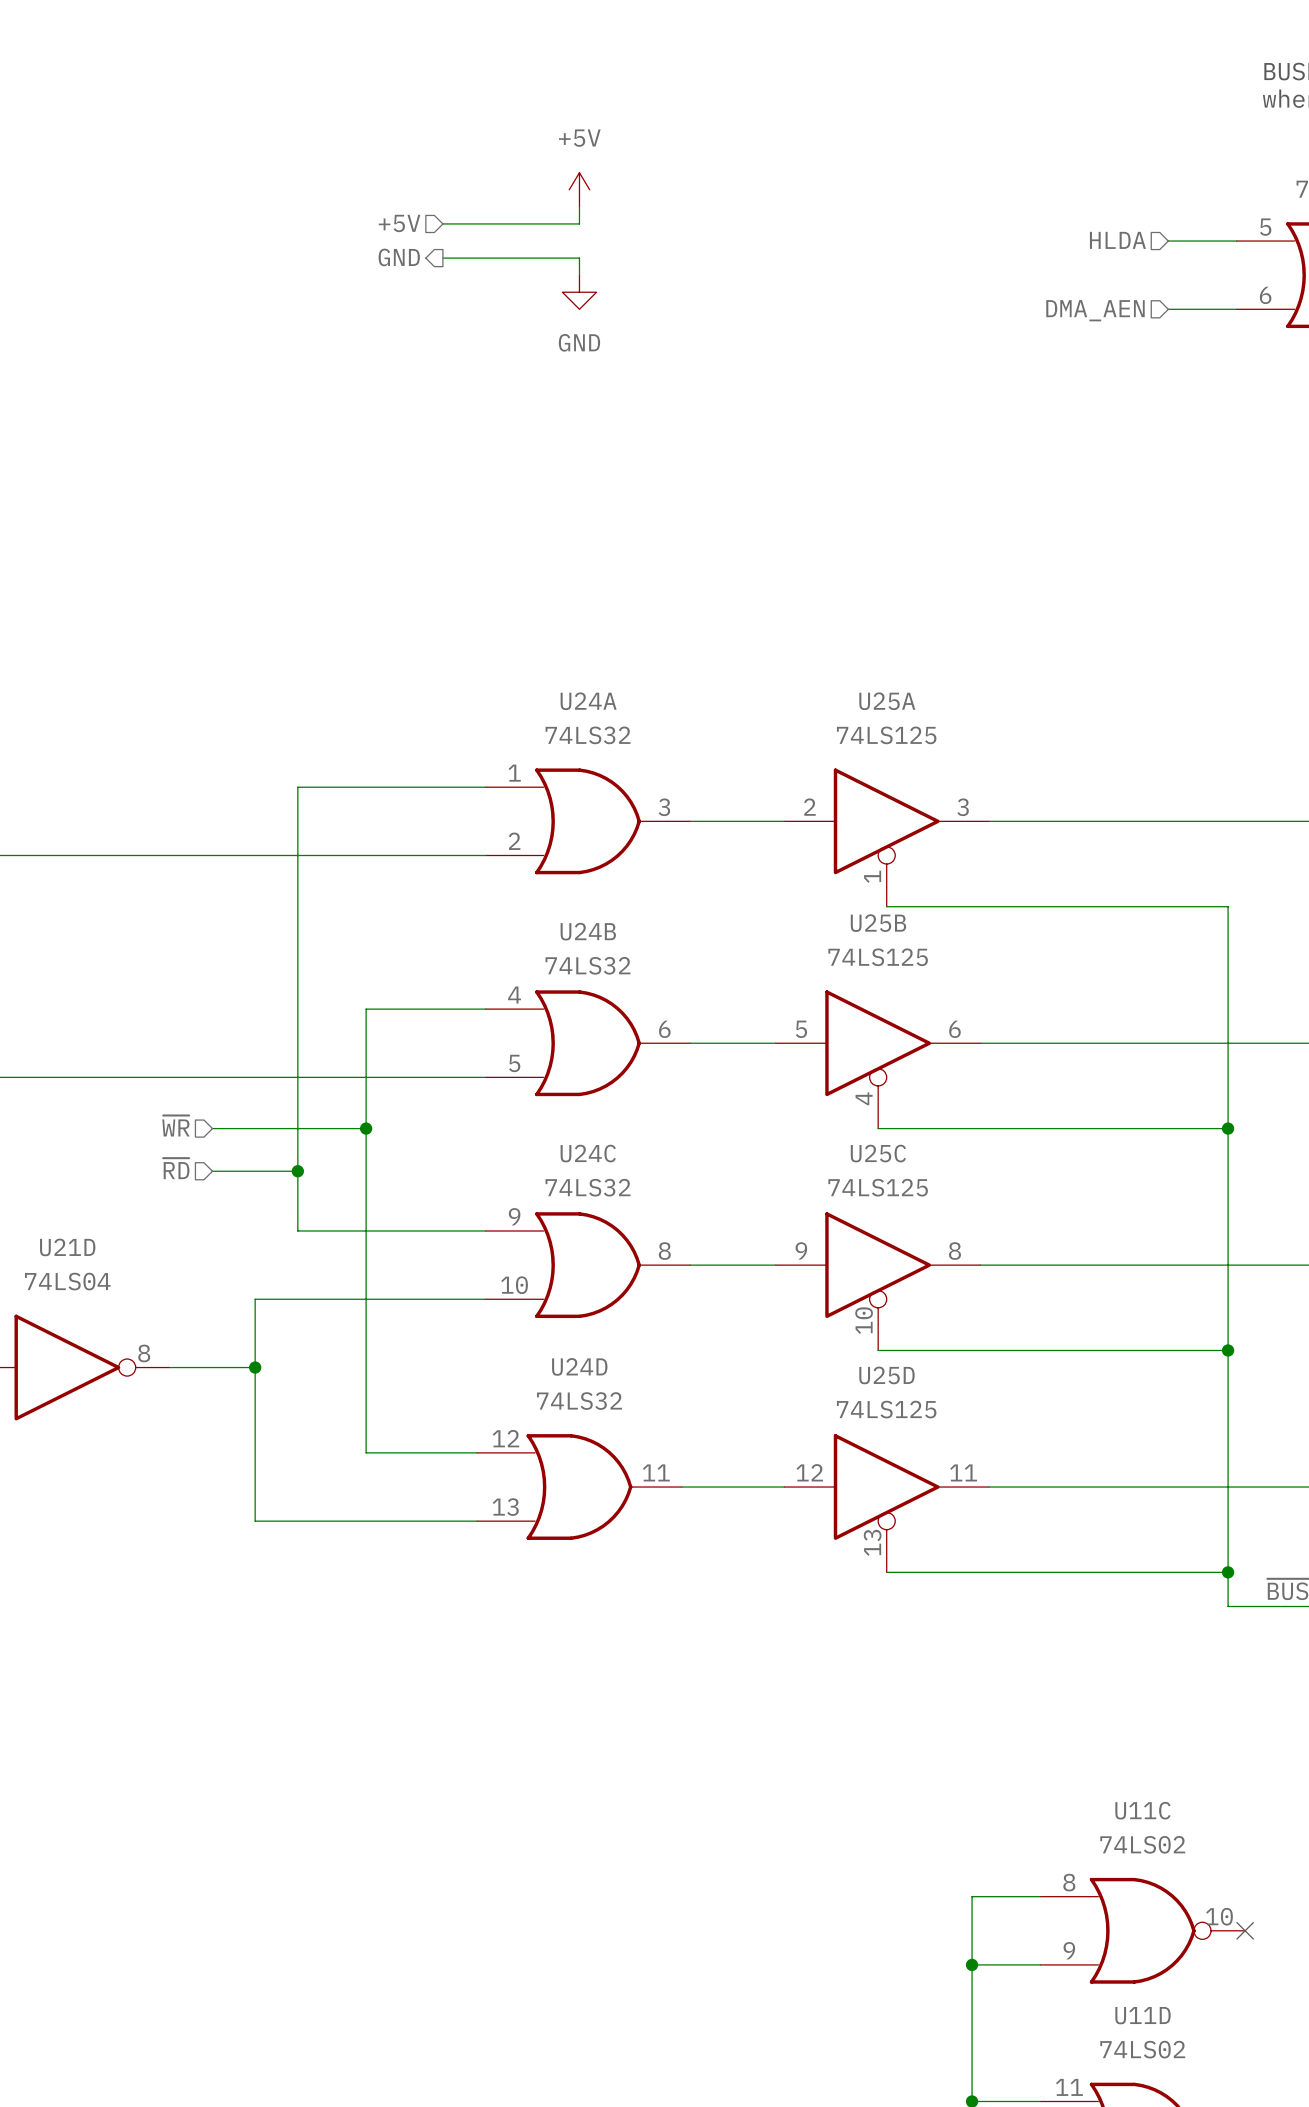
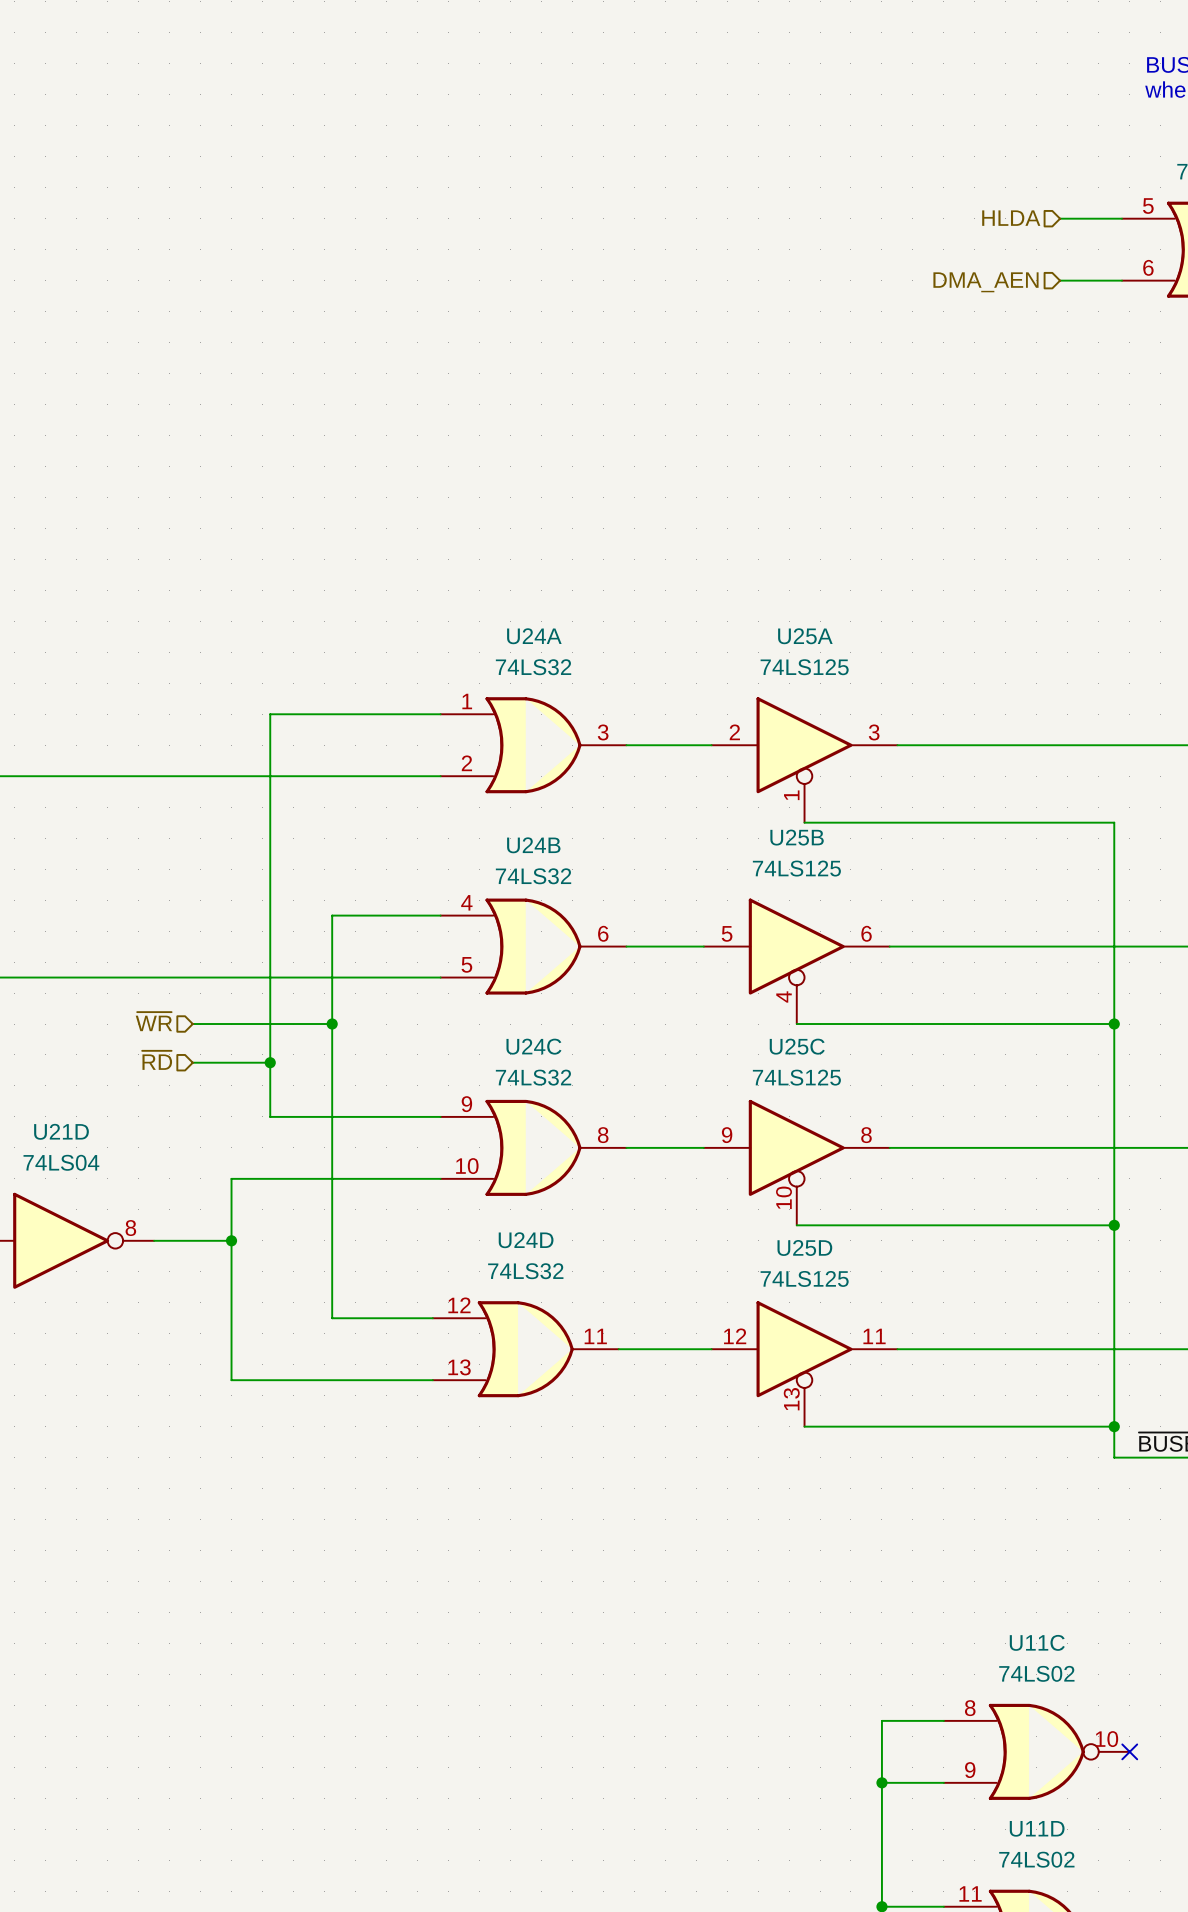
power symbol: +5V (579, 189) -> none
wire: (579, 206) (579, 223) (442, 223) -> none
hierarchical label: +5V (399, 223) -> none
hierarchical label: GND (399, 257) -> none
wire: (442, 258) (579, 258) (579, 275) -> none
power symbol: GND (579, 292) -> none

